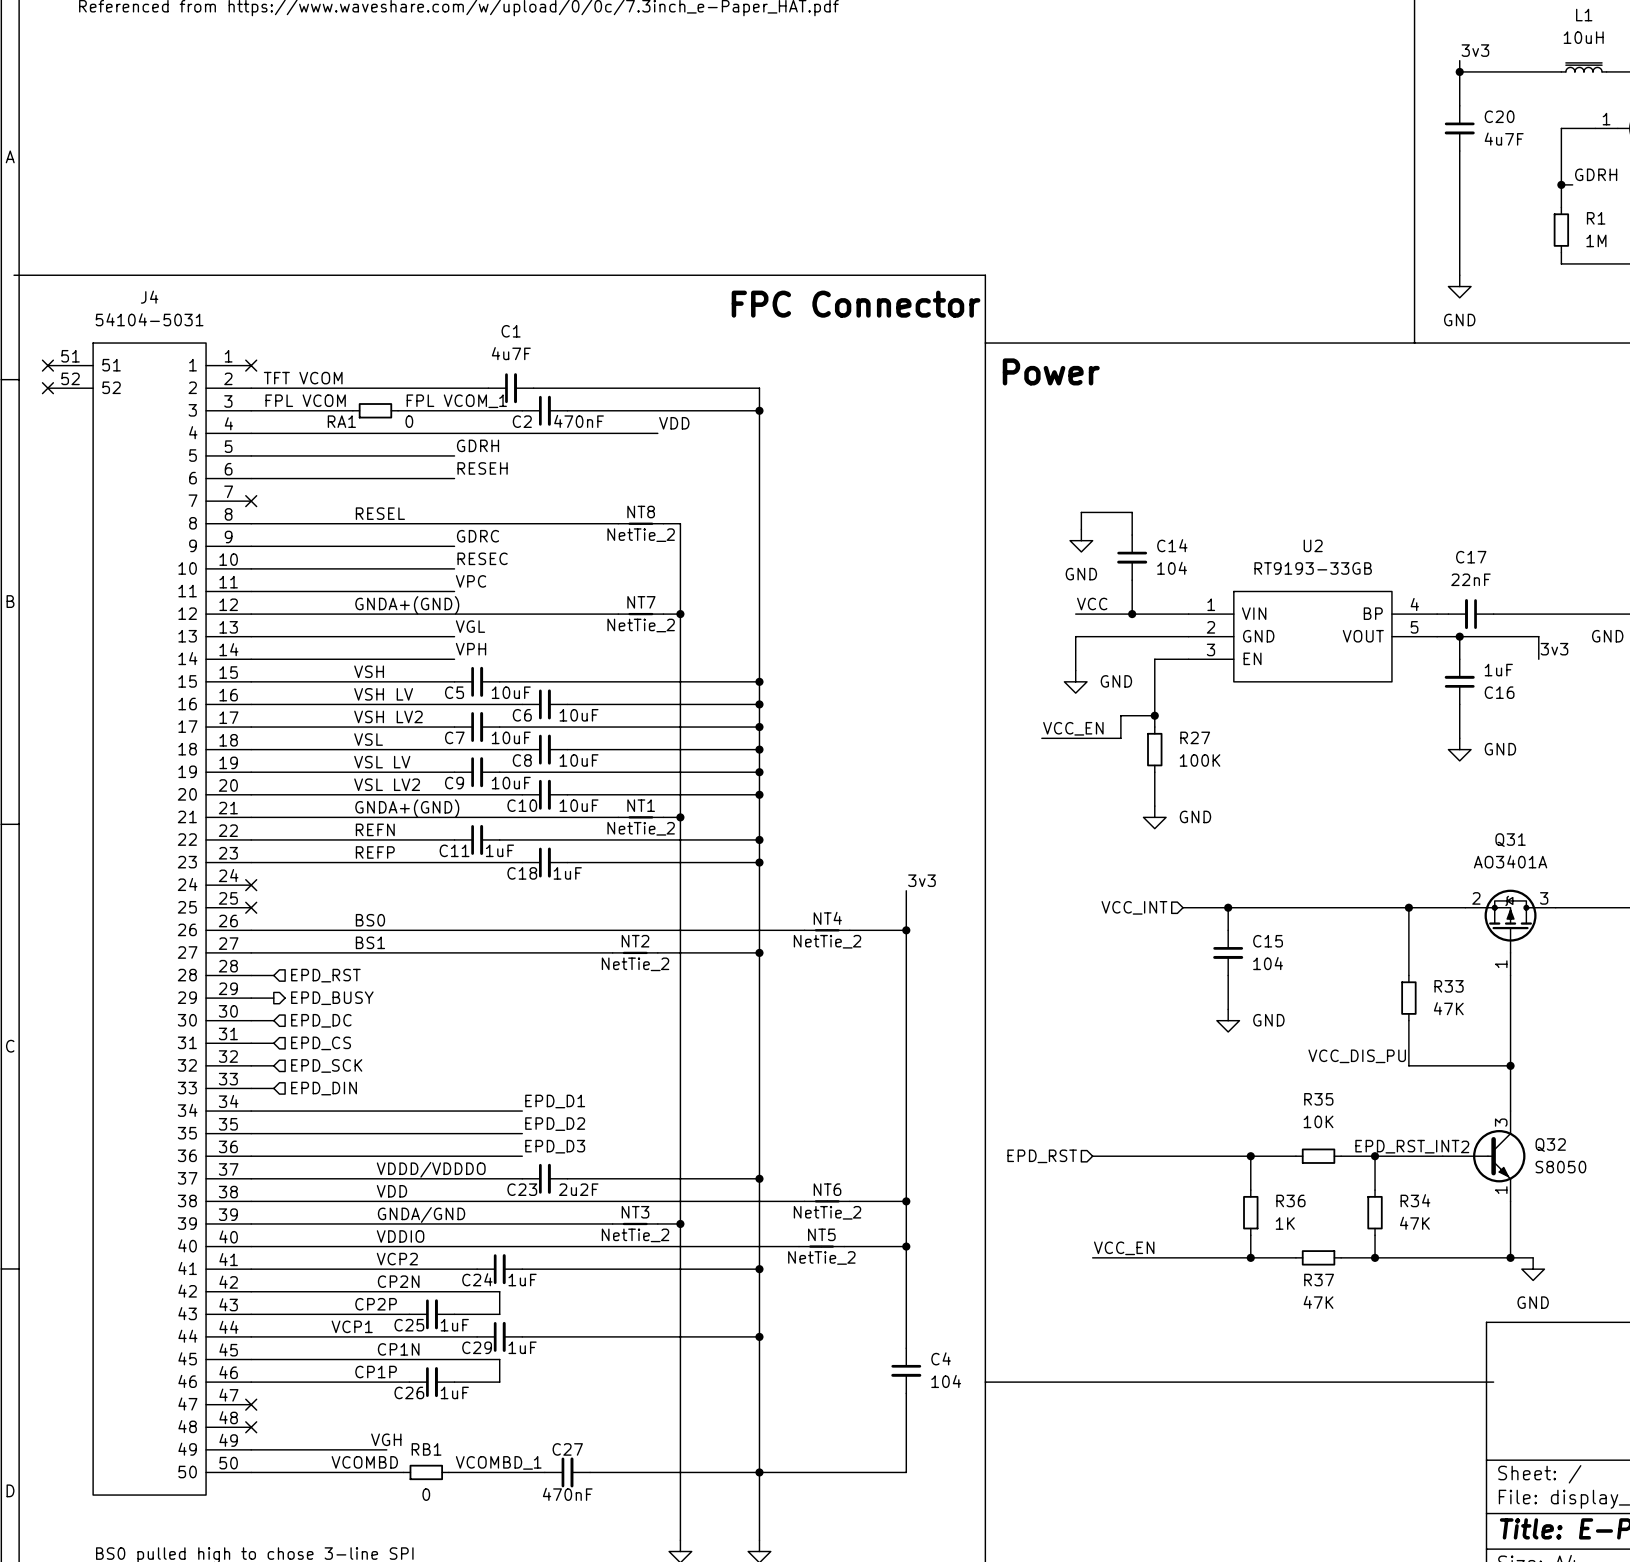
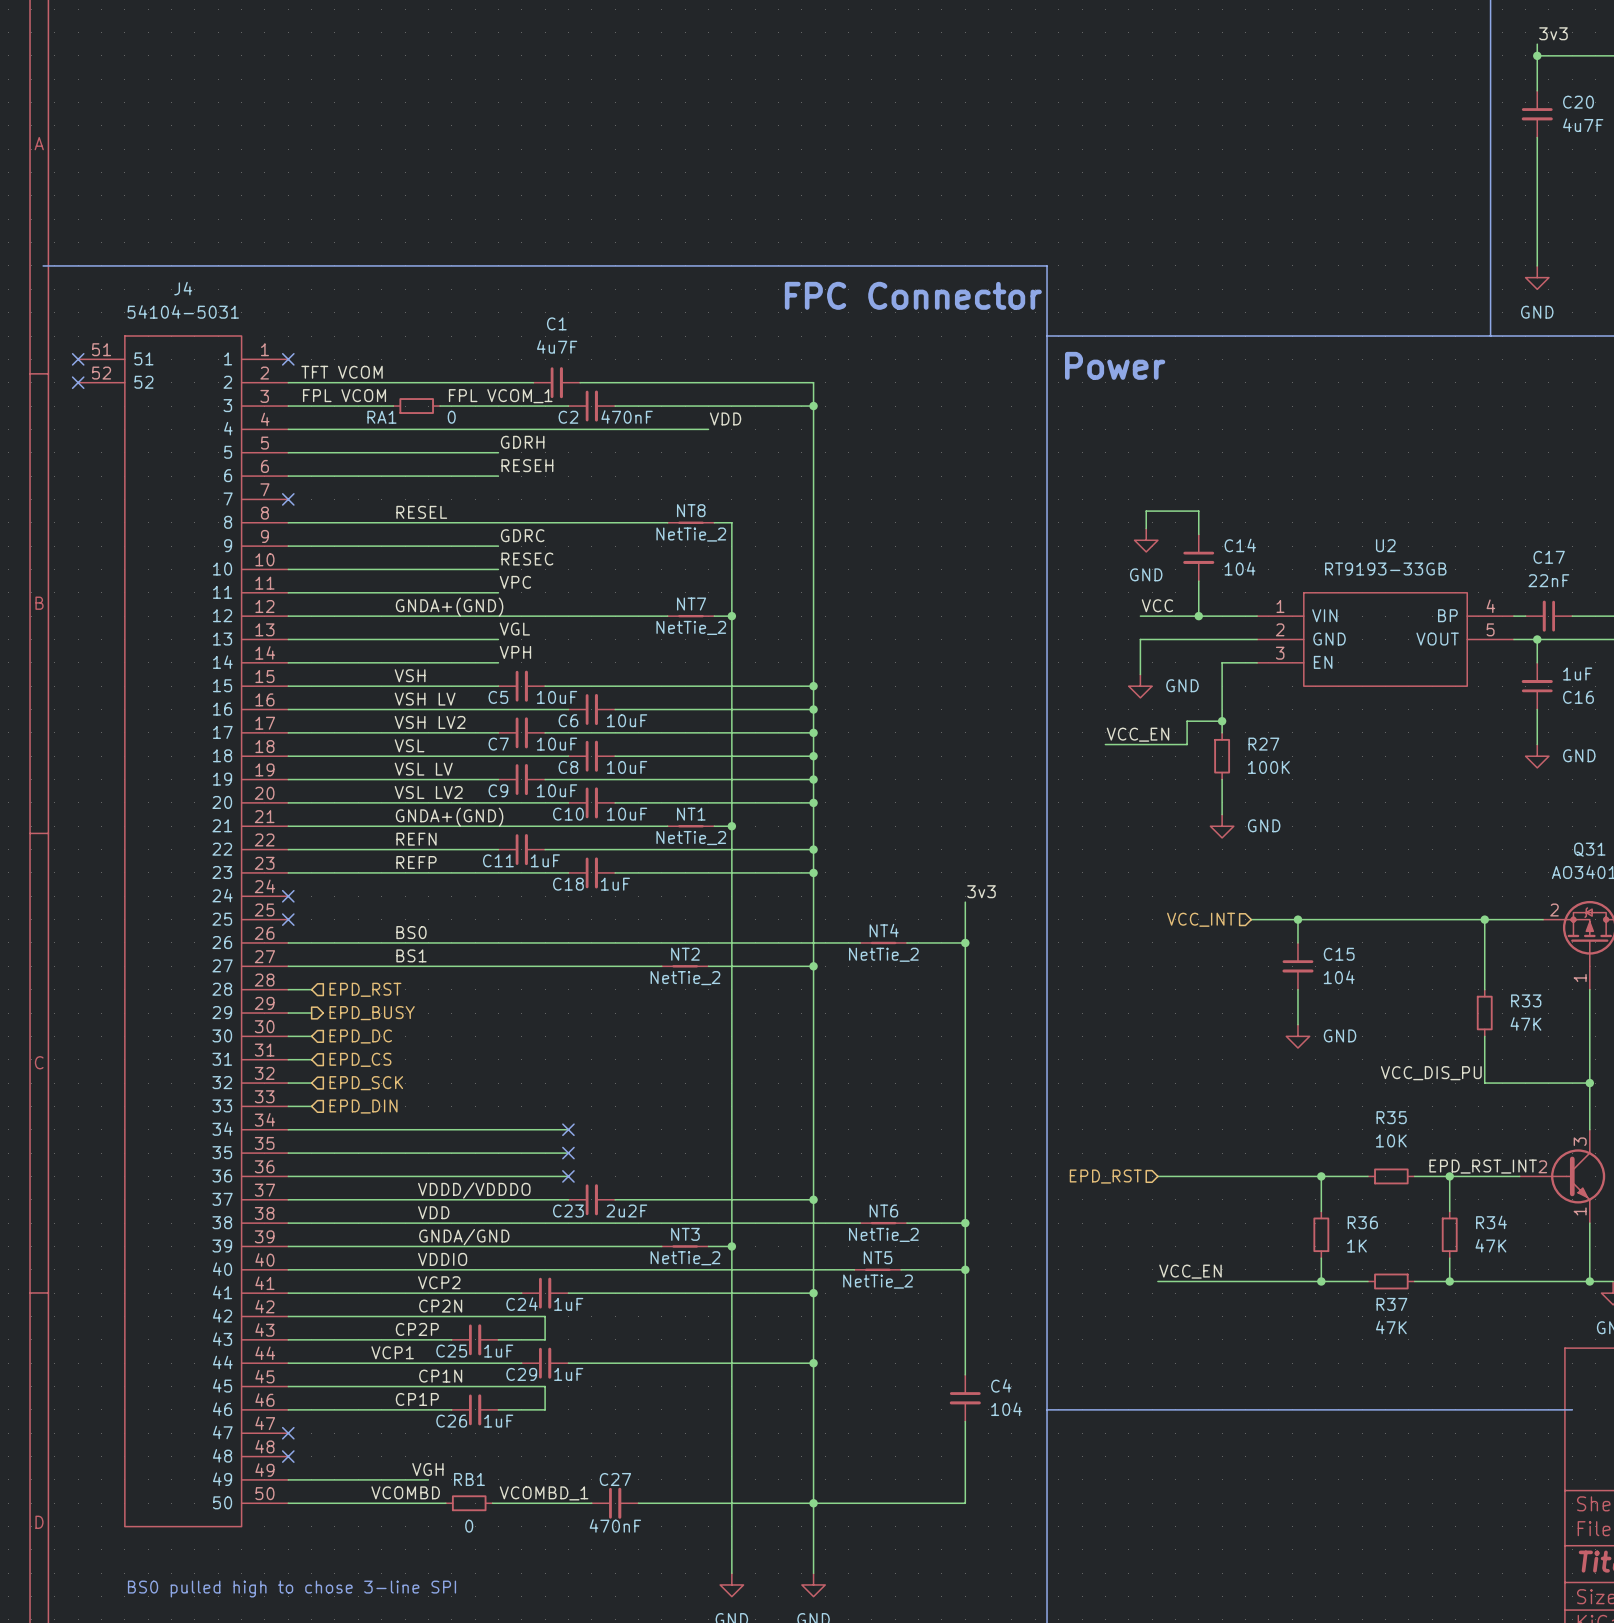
label: EPD_D1 (555, 1101) -> none
no-connect mark: none -> (568, 1129)
label: EPD_D2 (555, 1124) -> none
no-connect mark: none -> (568, 1153)
label: EPD_D3 (555, 1146) -> none
no-connect mark: none -> (568, 1176)

